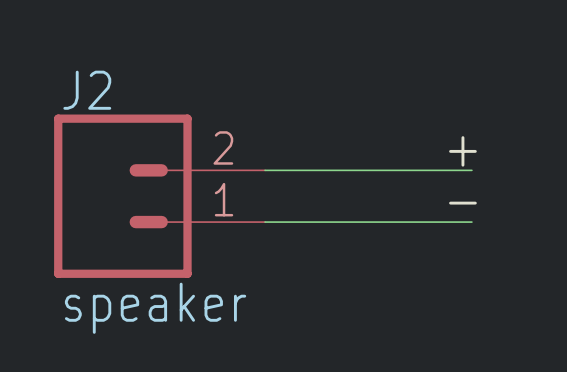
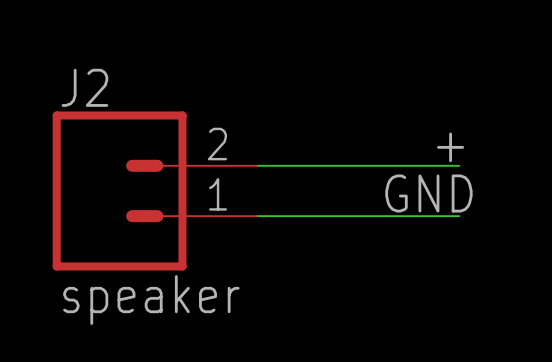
label: none -> GND (428, 193)
label: - (462, 203) -> none

